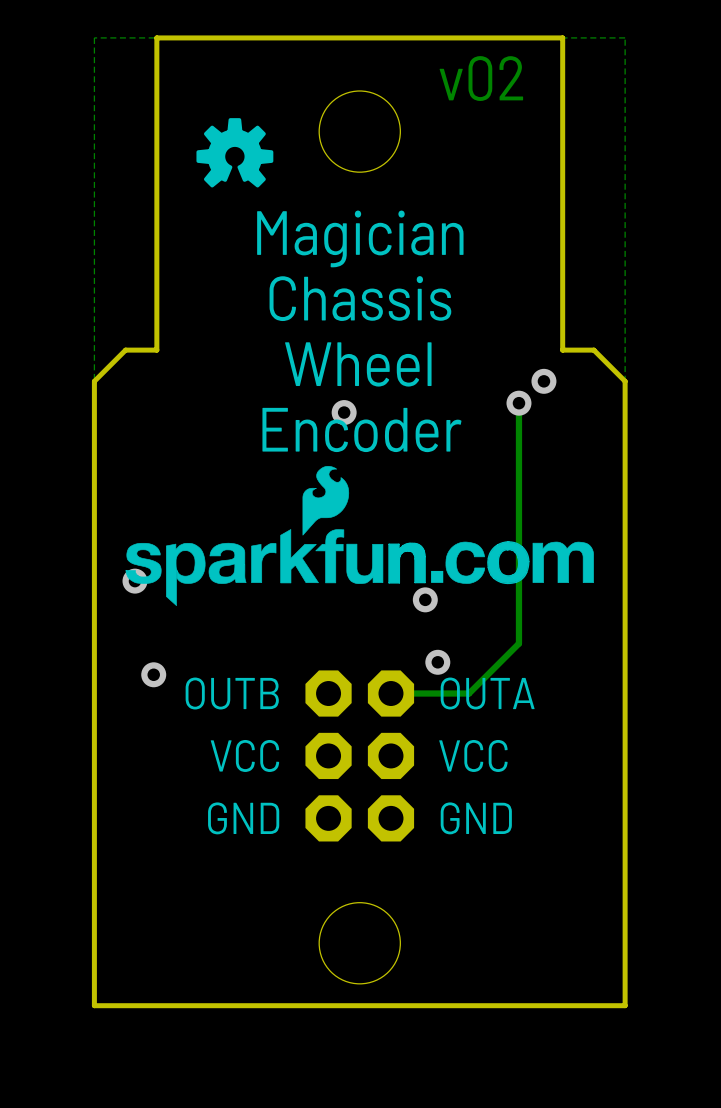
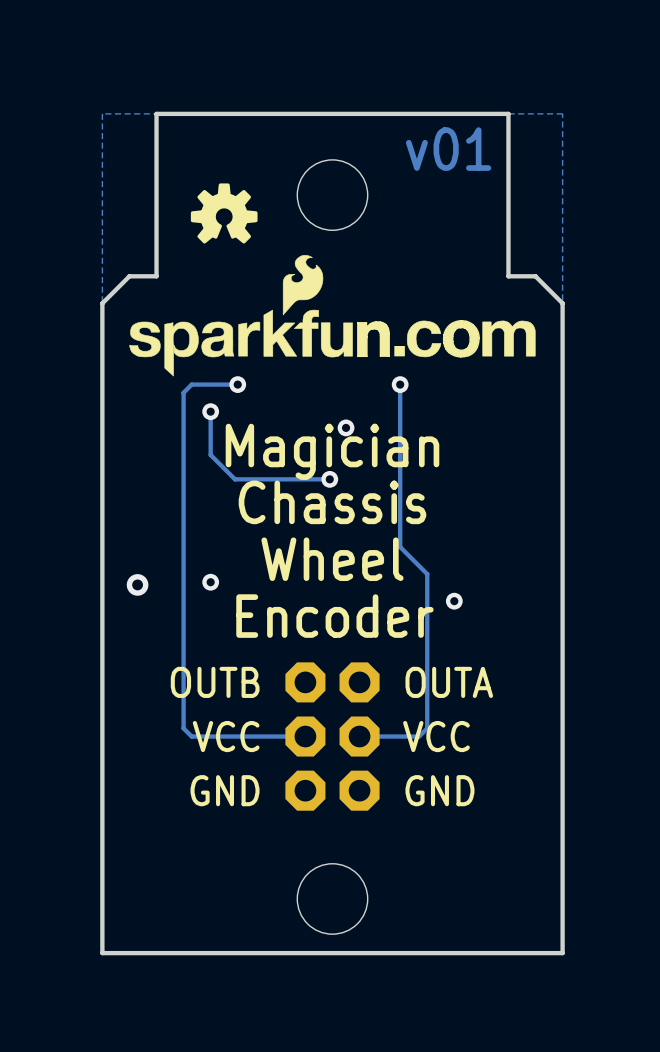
text: v02 (481, 78) -> v01 (448, 149)
board edge: (156, 225) (156, 350) (125, 350) (94, 381) -> (156, 276) (129, 276) (102, 303) (102, 411)
board edge: (562, 225) (562, 350) (593, 350) (625, 381) -> (508, 276) (535, 276) (562, 303) (562, 411)
text position: Magician (360, 238) -> Magician (332, 451)
text position: Chassis (360, 298) -> Chassis (332, 502)
track: none -> (237, 384) (191, 384) (183, 392) (183, 728) (191, 736) (305, 736)
via: none -> (237, 384)
track: none -> (400, 384) (400, 547) (427, 574) (427, 728) (419, 736) (359, 736)
via: none -> (400, 384)
text position: Wheel (358, 364) -> Wheel (332, 559)
track: none -> (210, 411) (210, 454) (235, 479) (329, 479)
via: none -> (210, 411)
via: (543, 381) -> none
via: none -> (346, 427)
track: (518, 403) (518, 643) (469, 693) (390, 693) -> none
via: (518, 403) -> none
via: (344, 412) -> none
text position: Encoder (361, 430) -> Encoder (334, 616)
via: none -> (329, 479)
drawing position: (359, 535) -> (332, 315)
via: none -> (210, 582)
via: (425, 599) -> none
via: none -> (454, 601)
via: (437, 662) -> none
via: (153, 674) -> none

